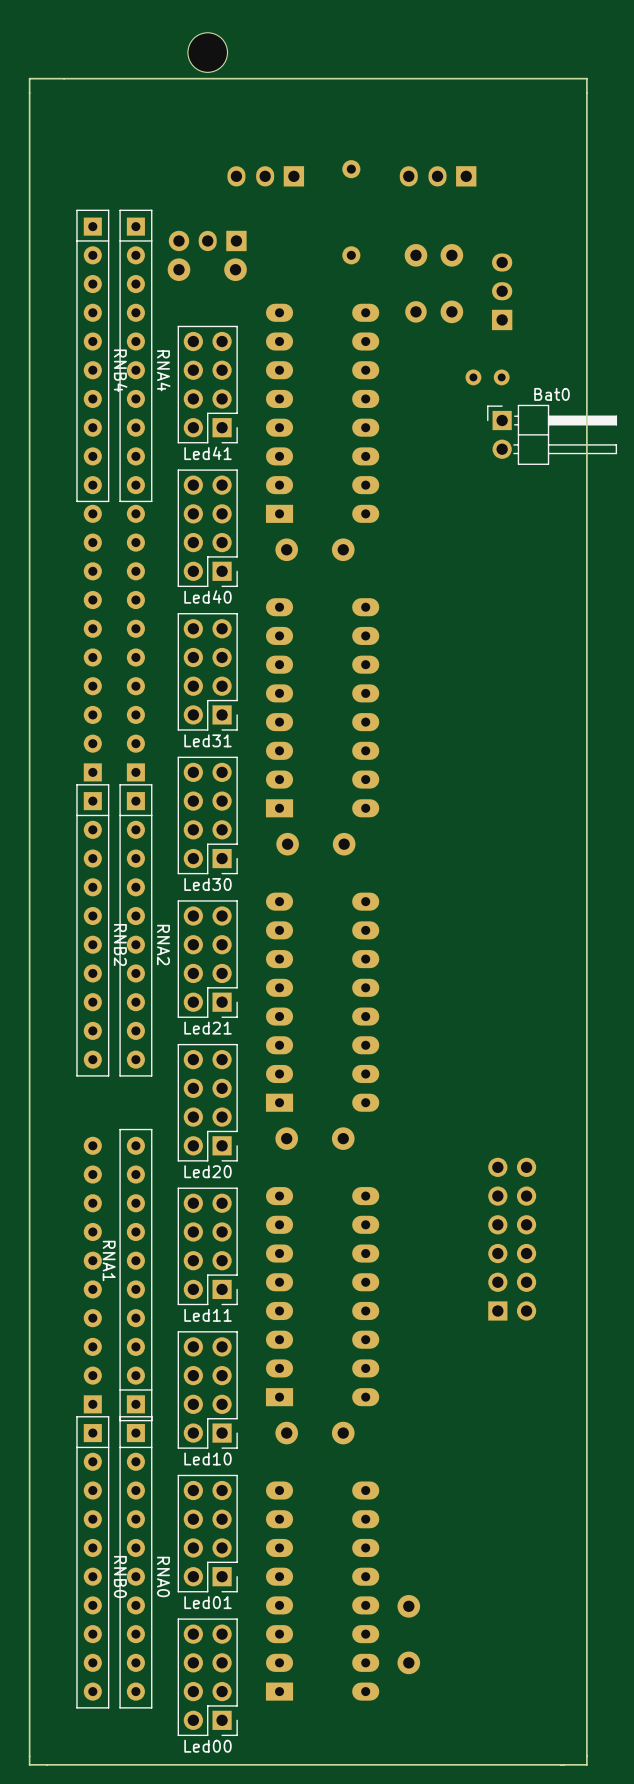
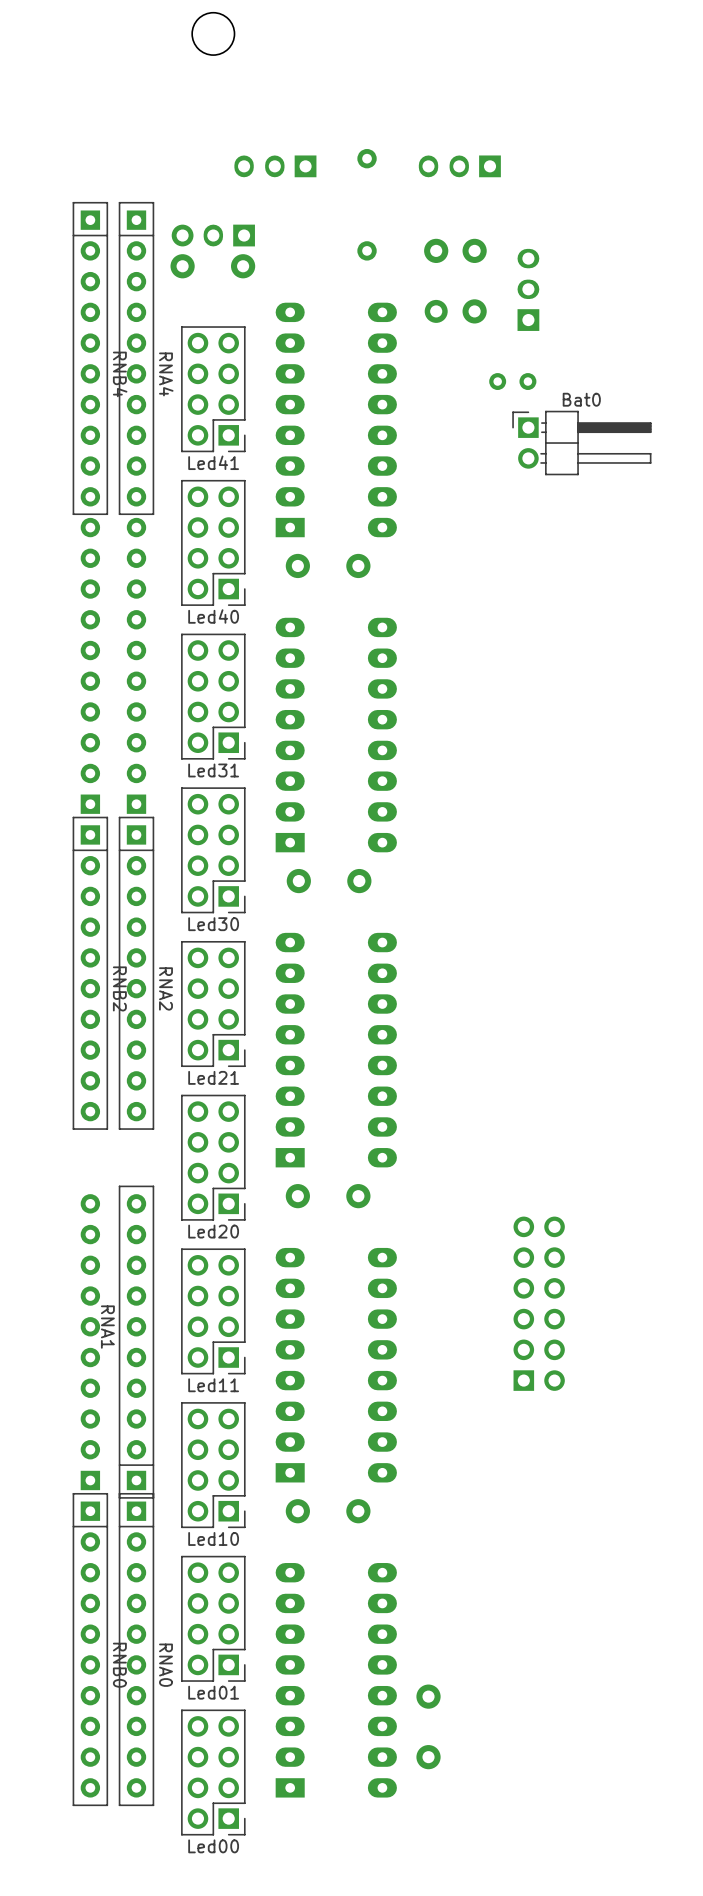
board edge: (586, 78) (586, 1764) (29, 1764) (29, 78) (586, 78) -> none

